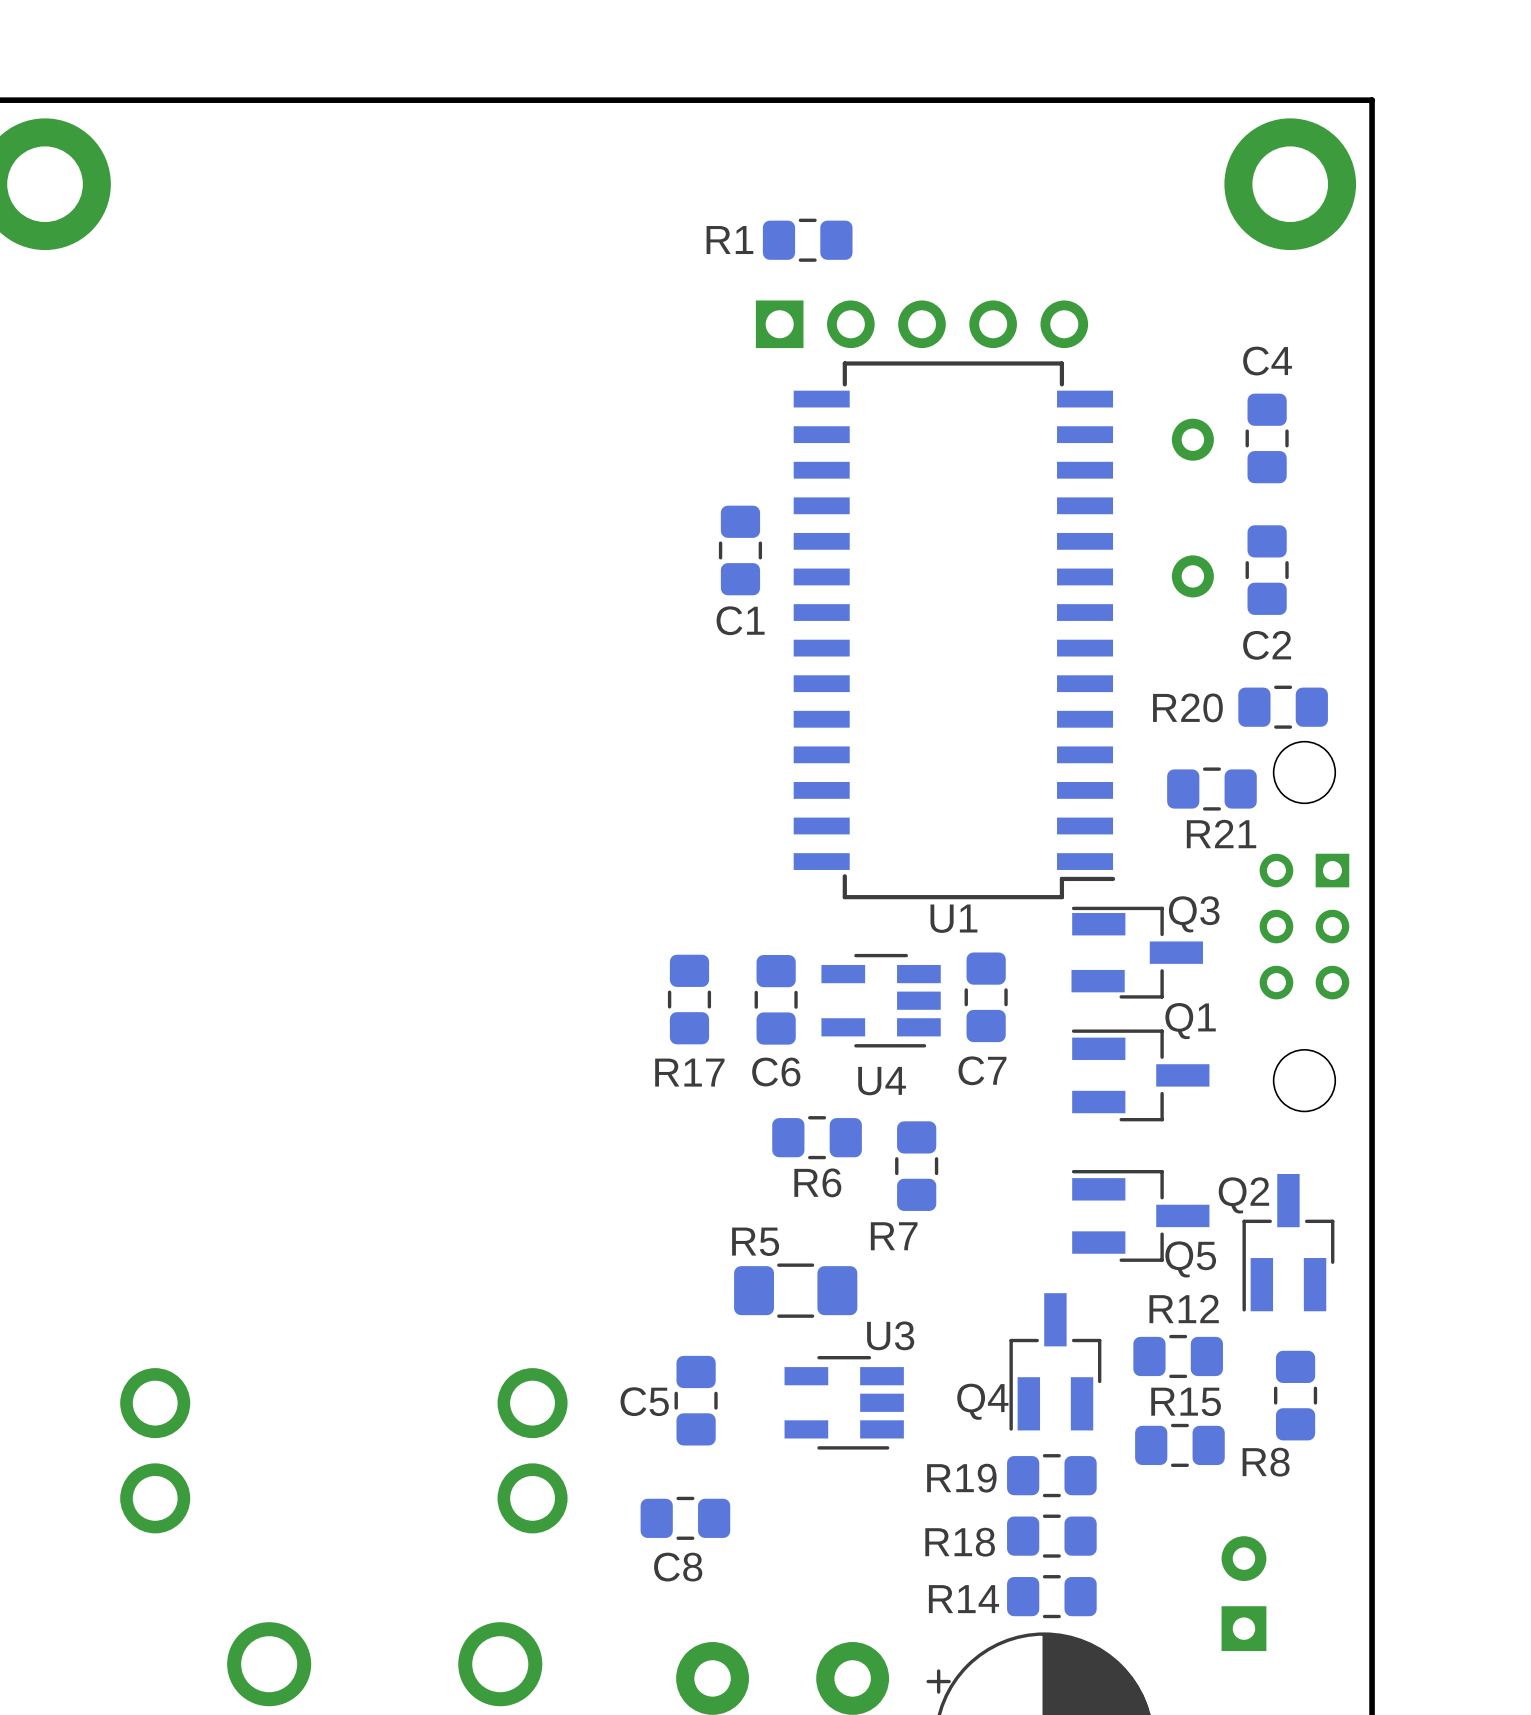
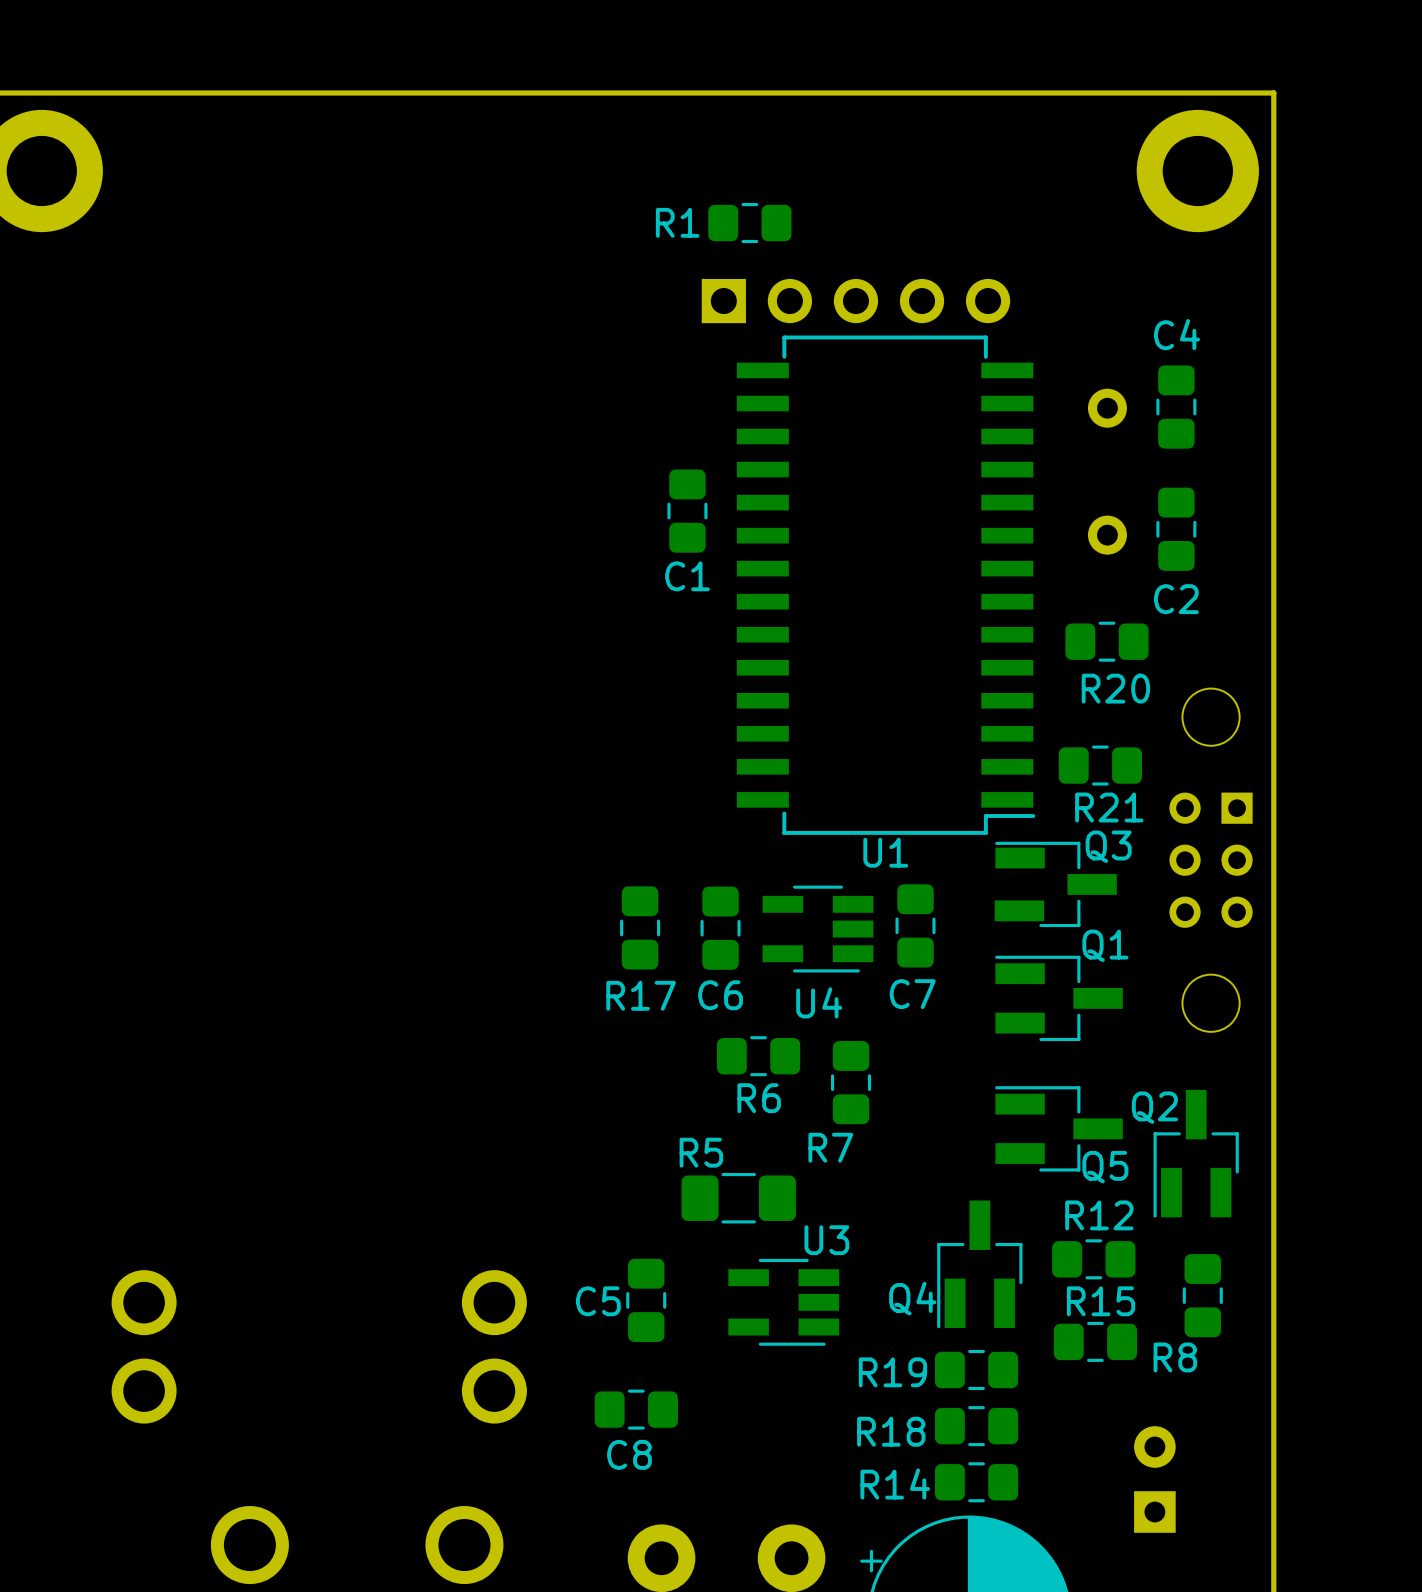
R20 name position: R20 (1187, 707) -> R20 (1115, 688)
R20 position: (1283, 707) -> (1107, 641)
R21 position: (1211, 789) -> (1100, 765)

